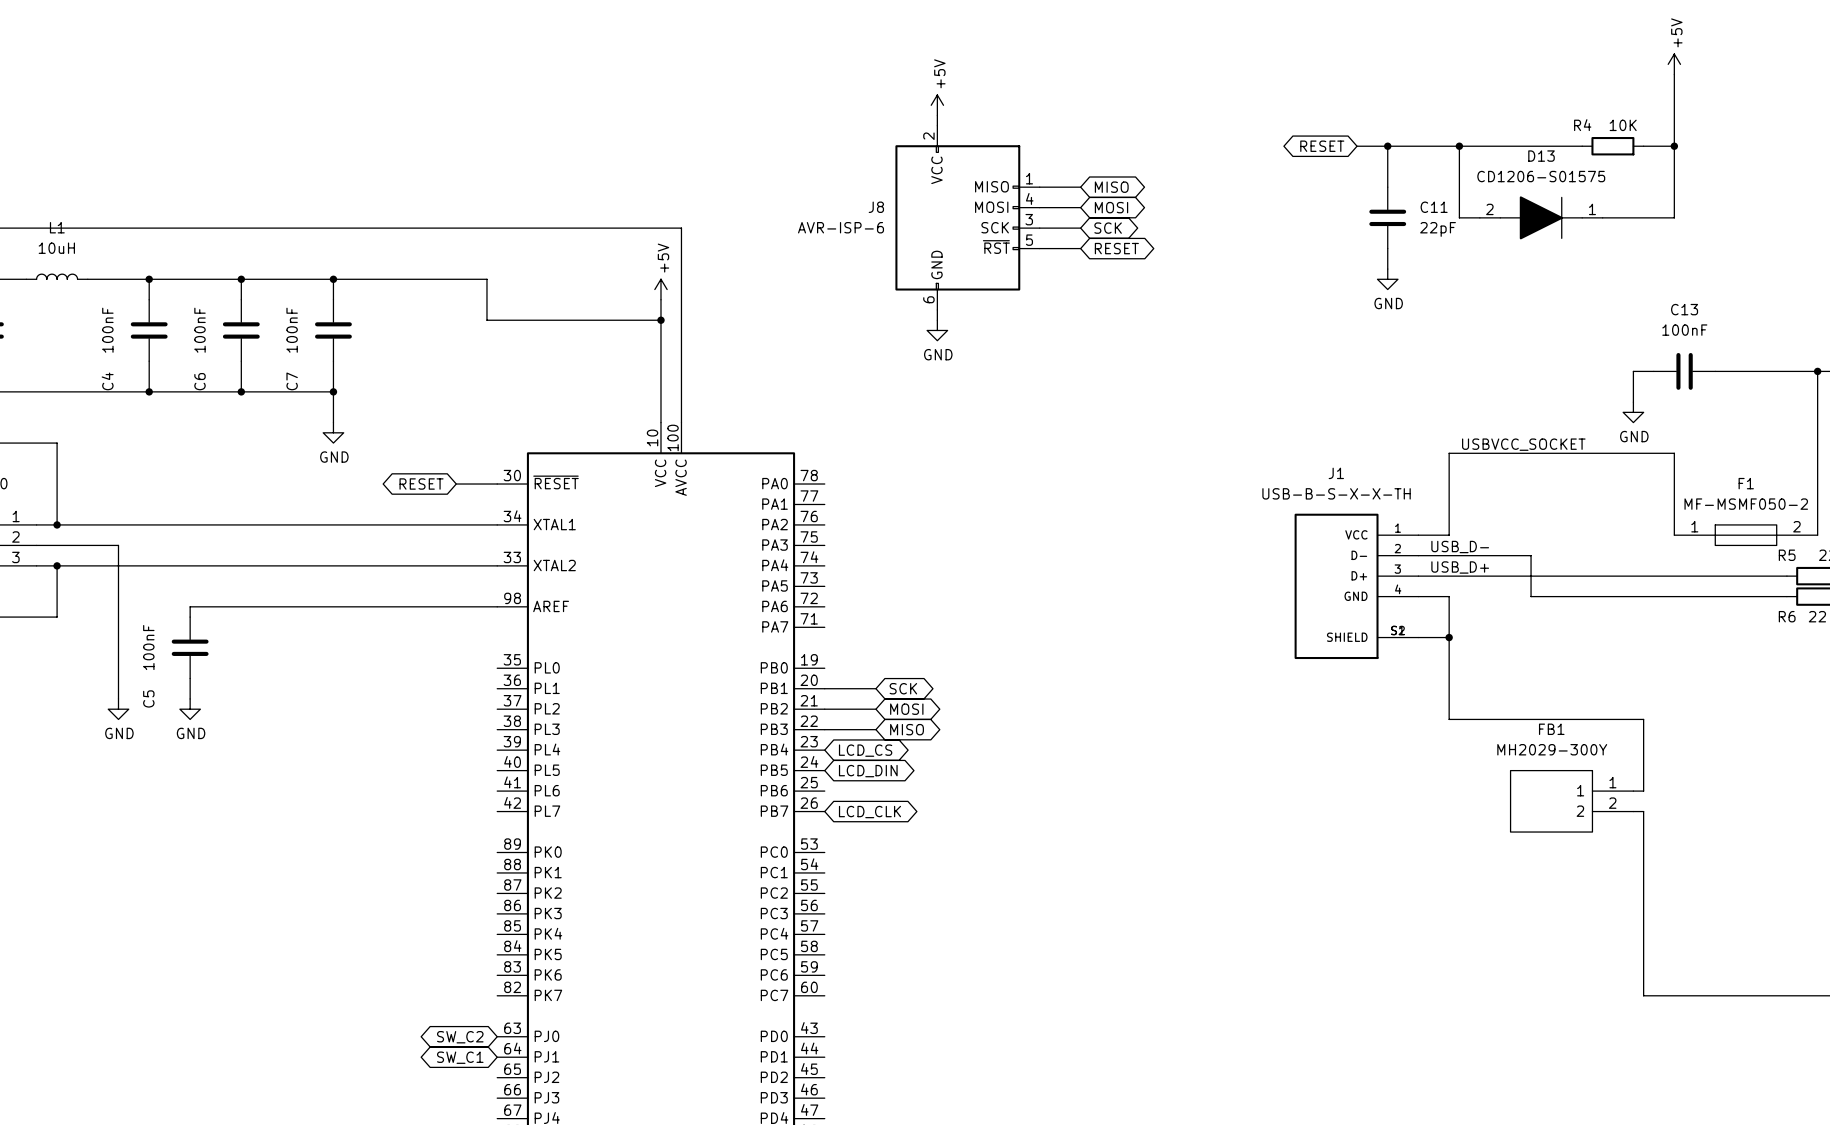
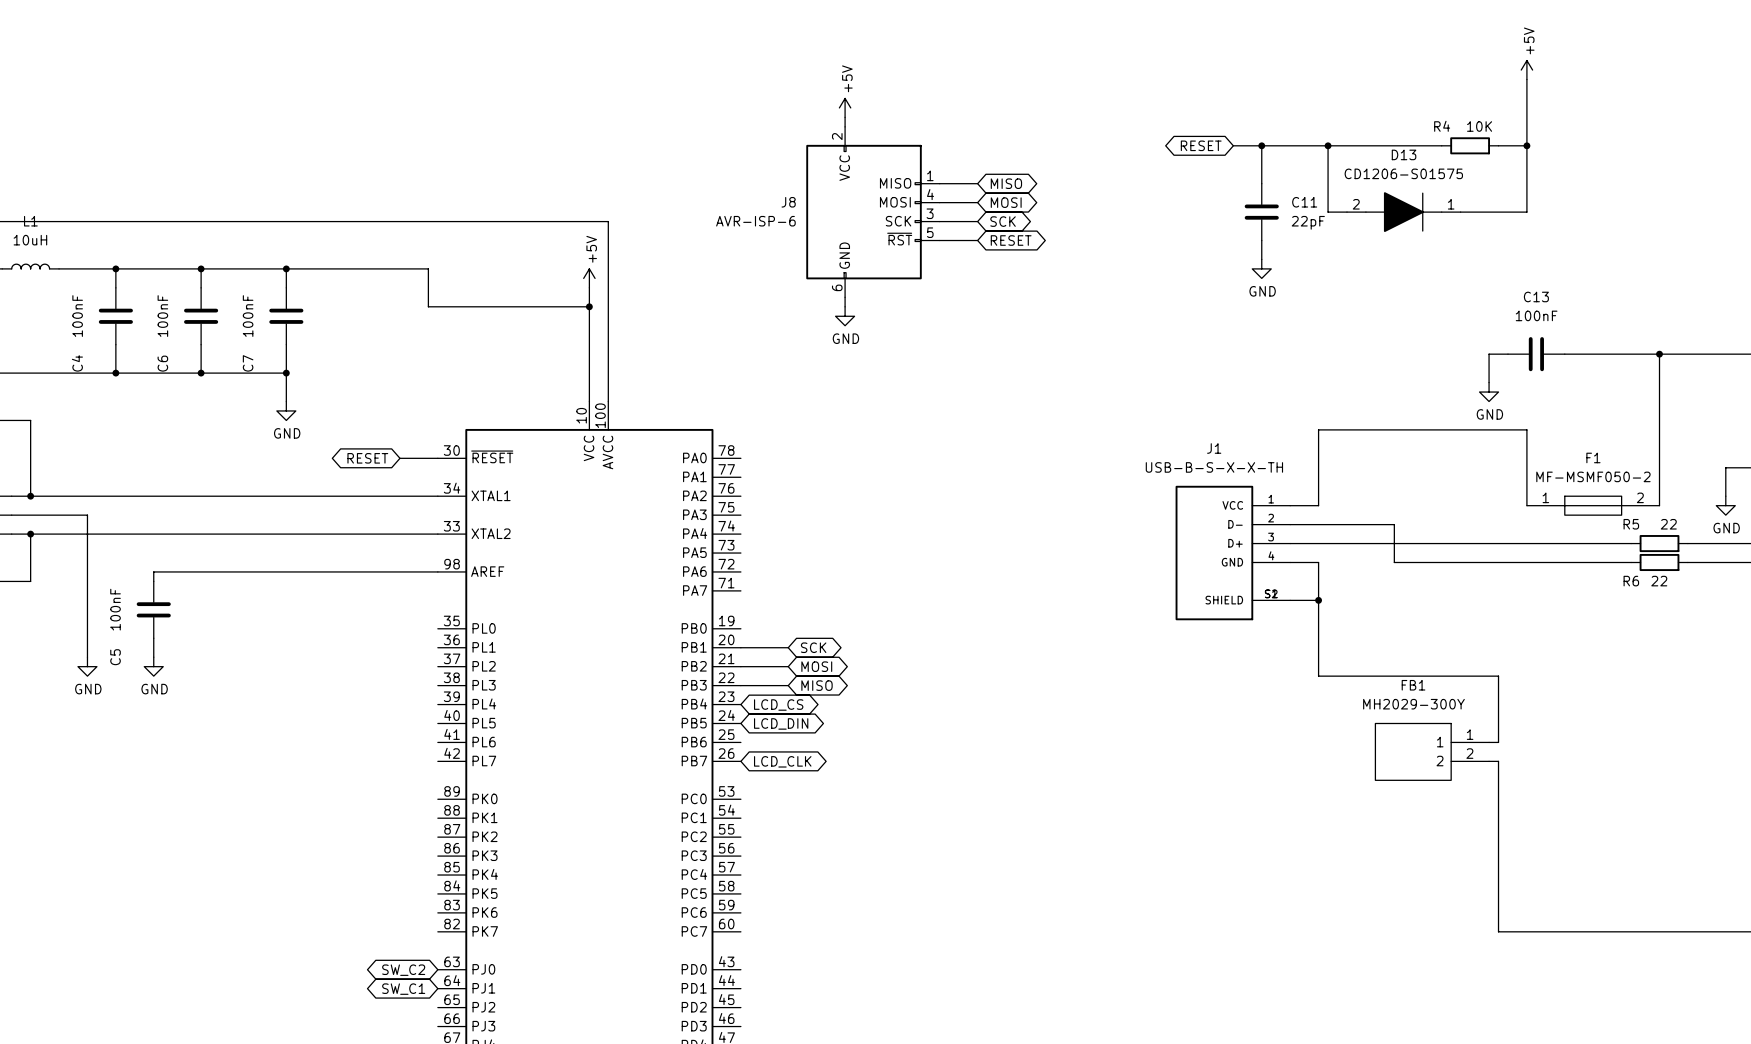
label: USBVCC_SOCKET (1523, 444) -> none
label: USB_D- (1460, 547) -> none
label: USB_D+ (1460, 567) -> none

